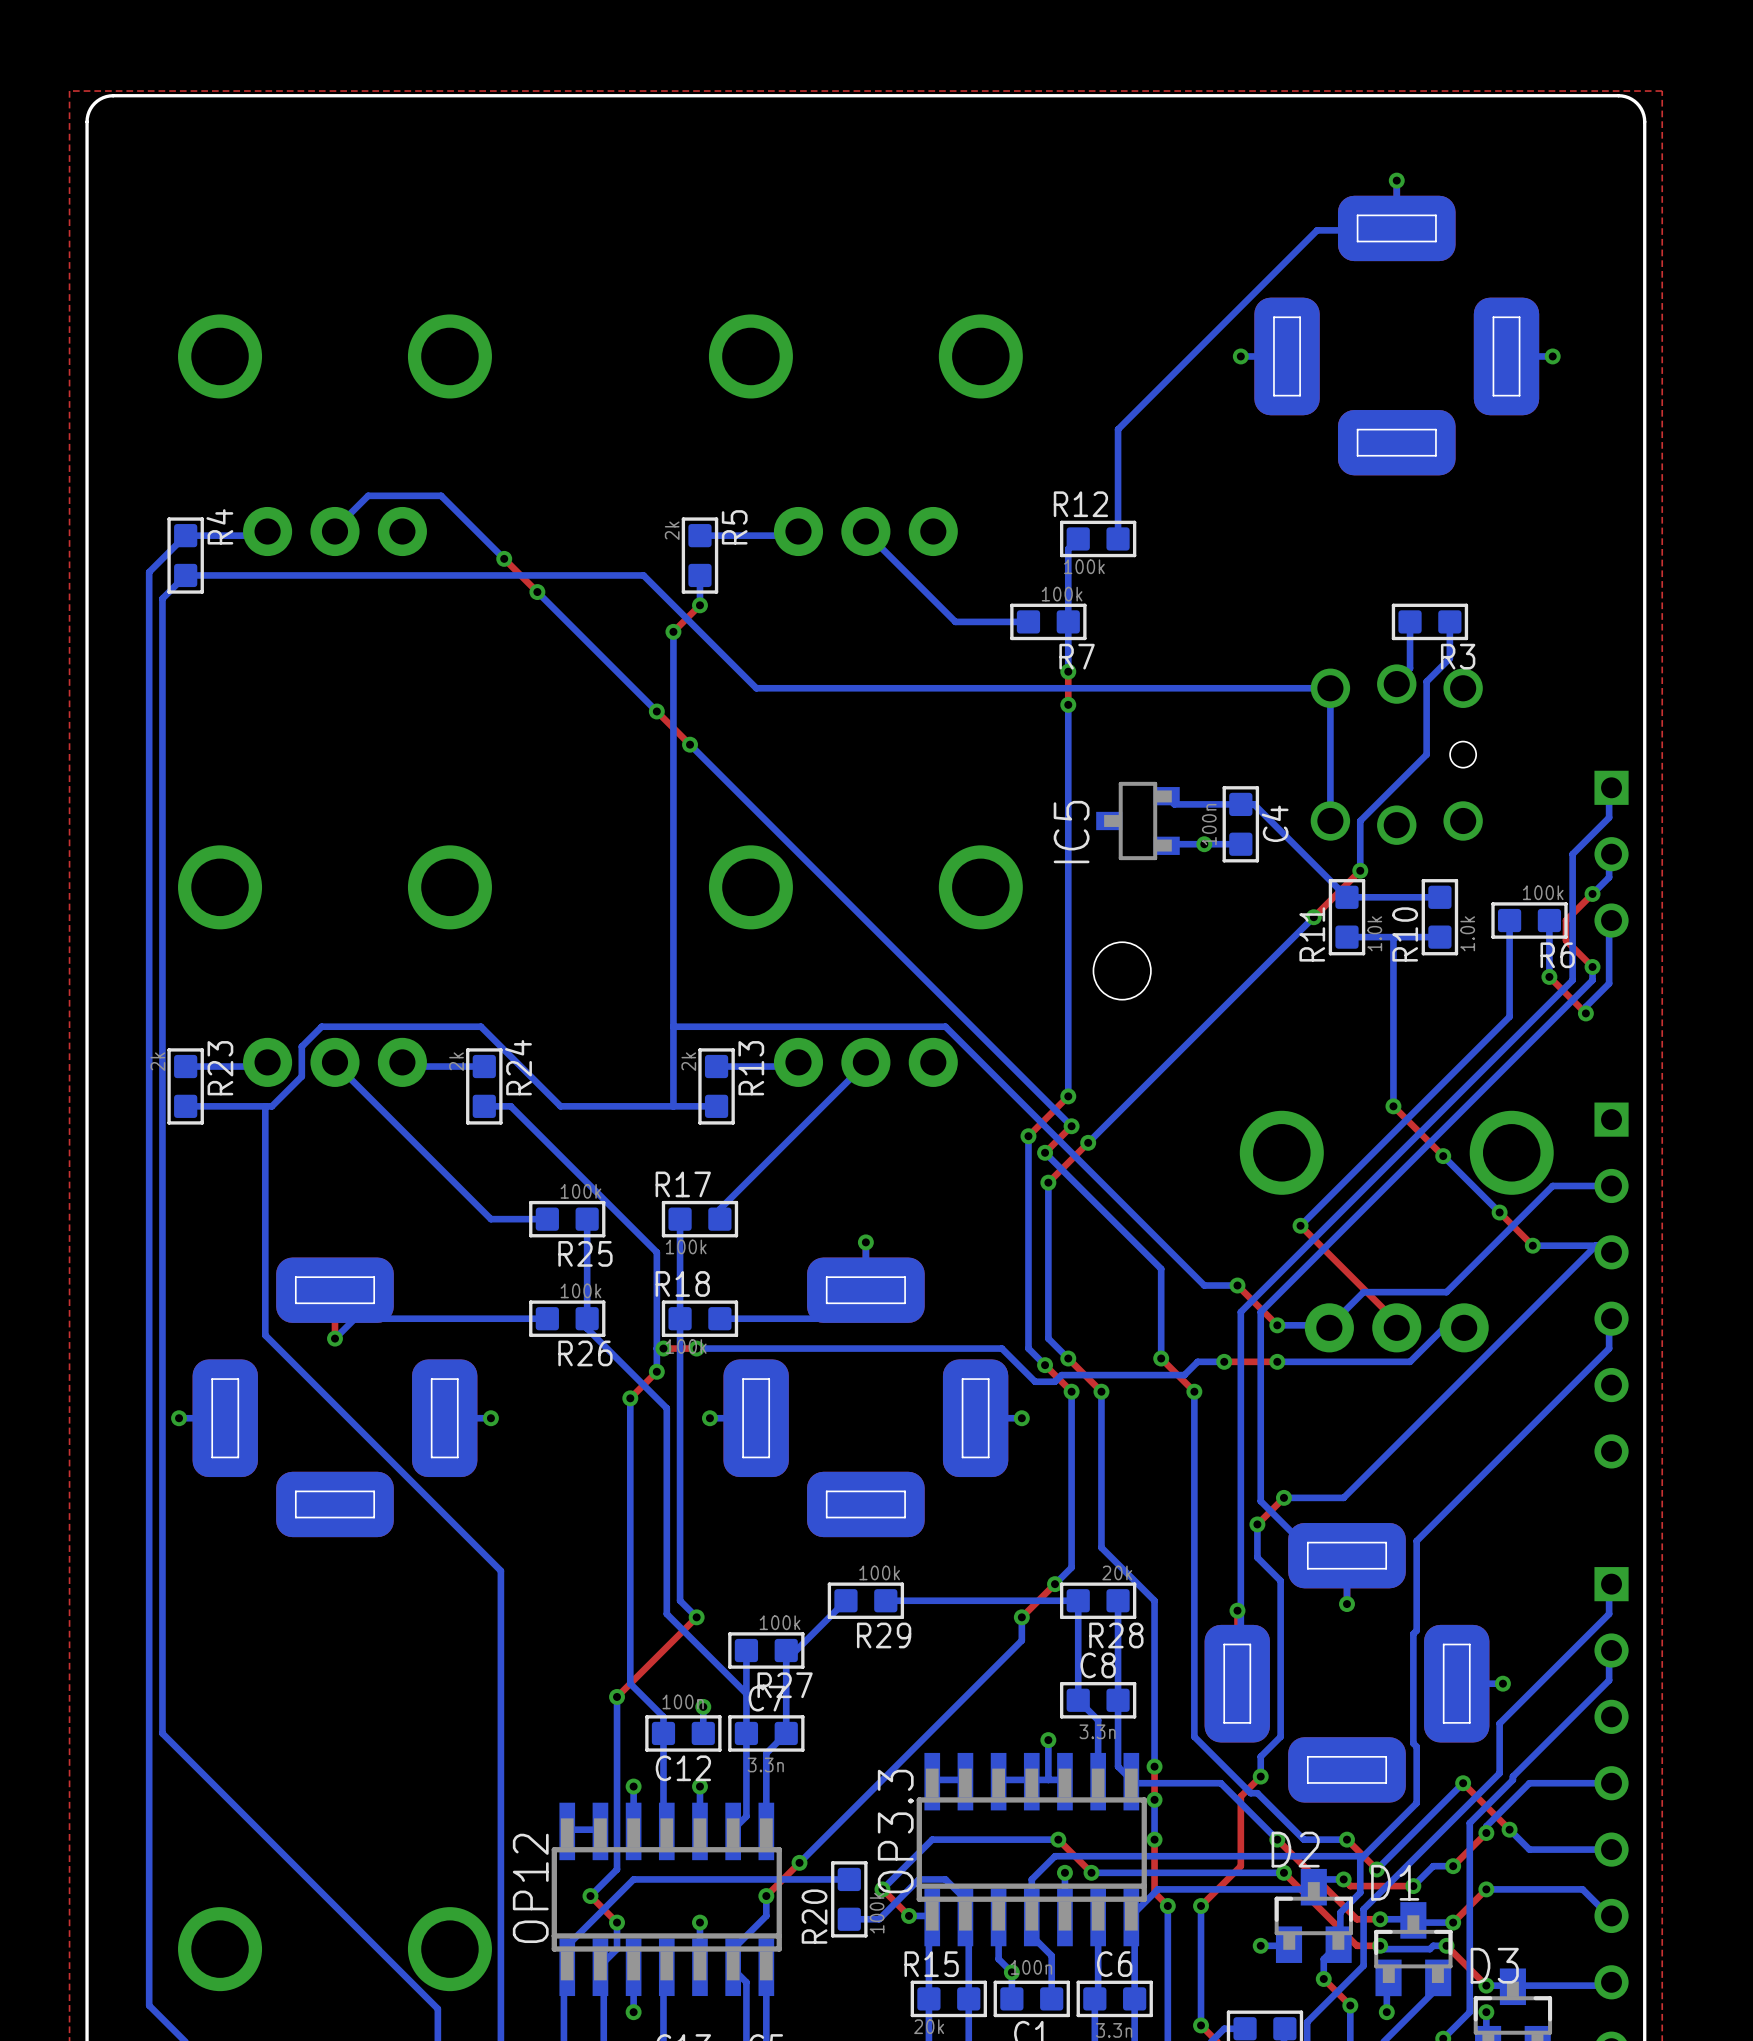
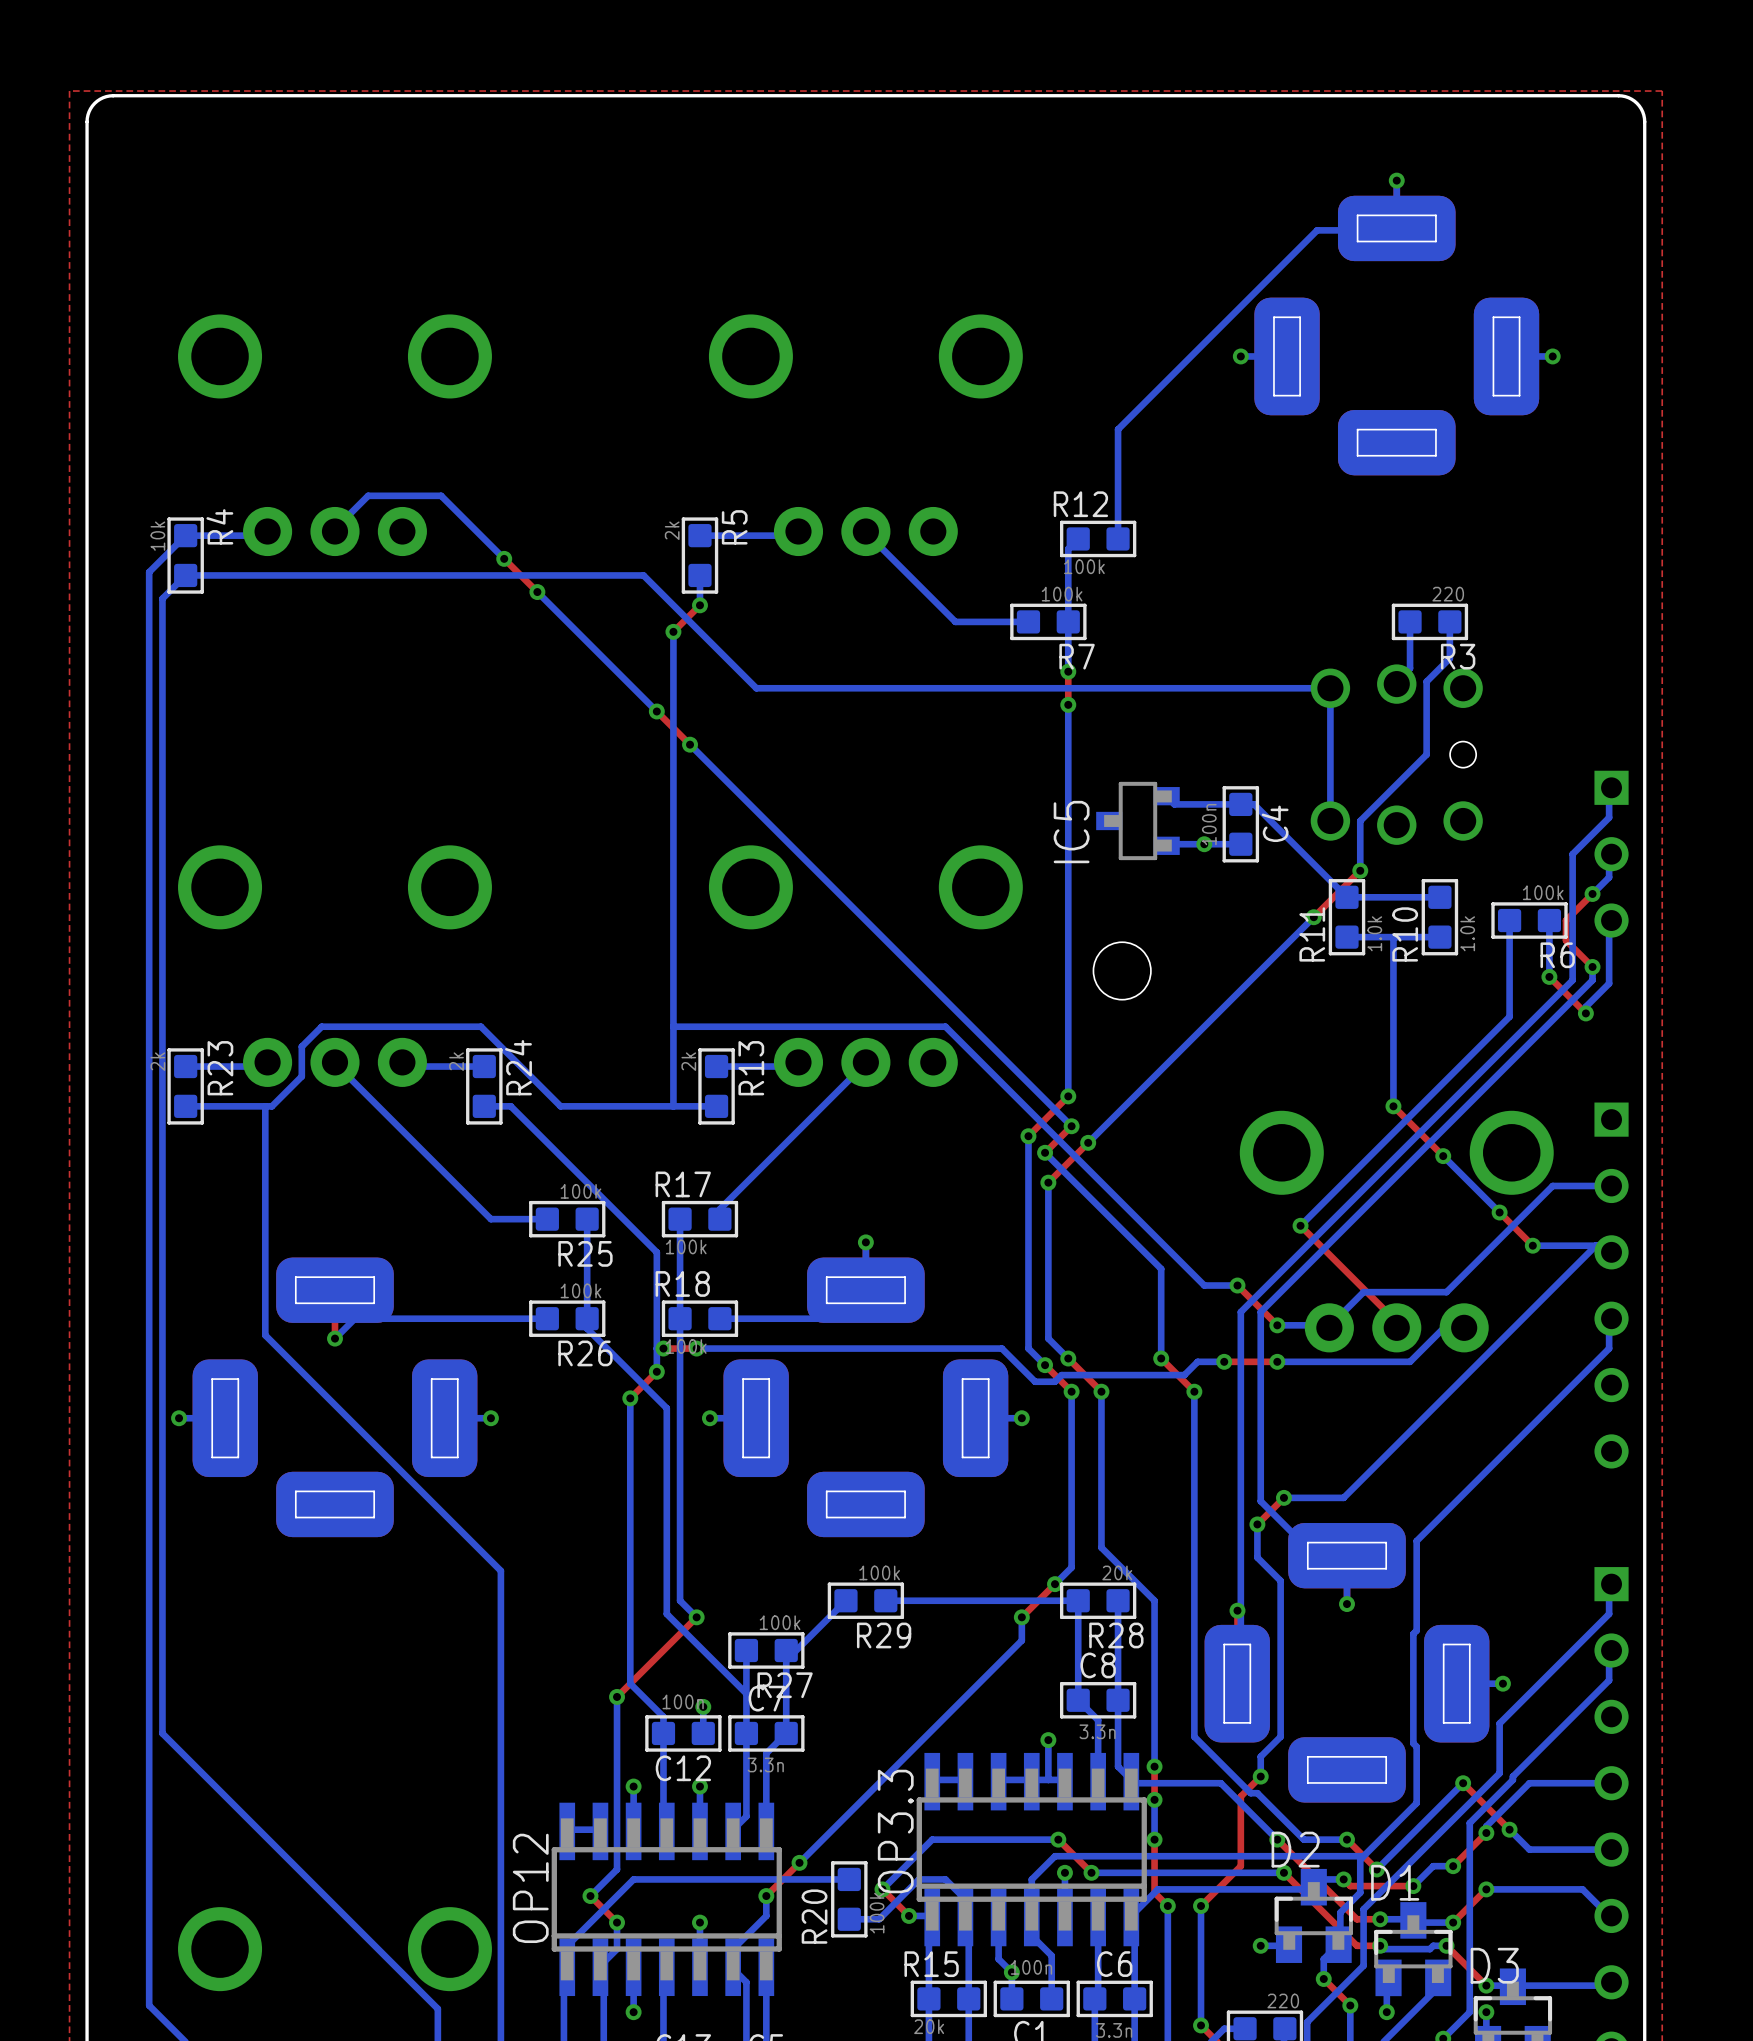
R4 value: none -> 10k (157, 536)
R3 value: none -> 220 (1448, 594)
part value: none -> 220 (1283, 2000)

